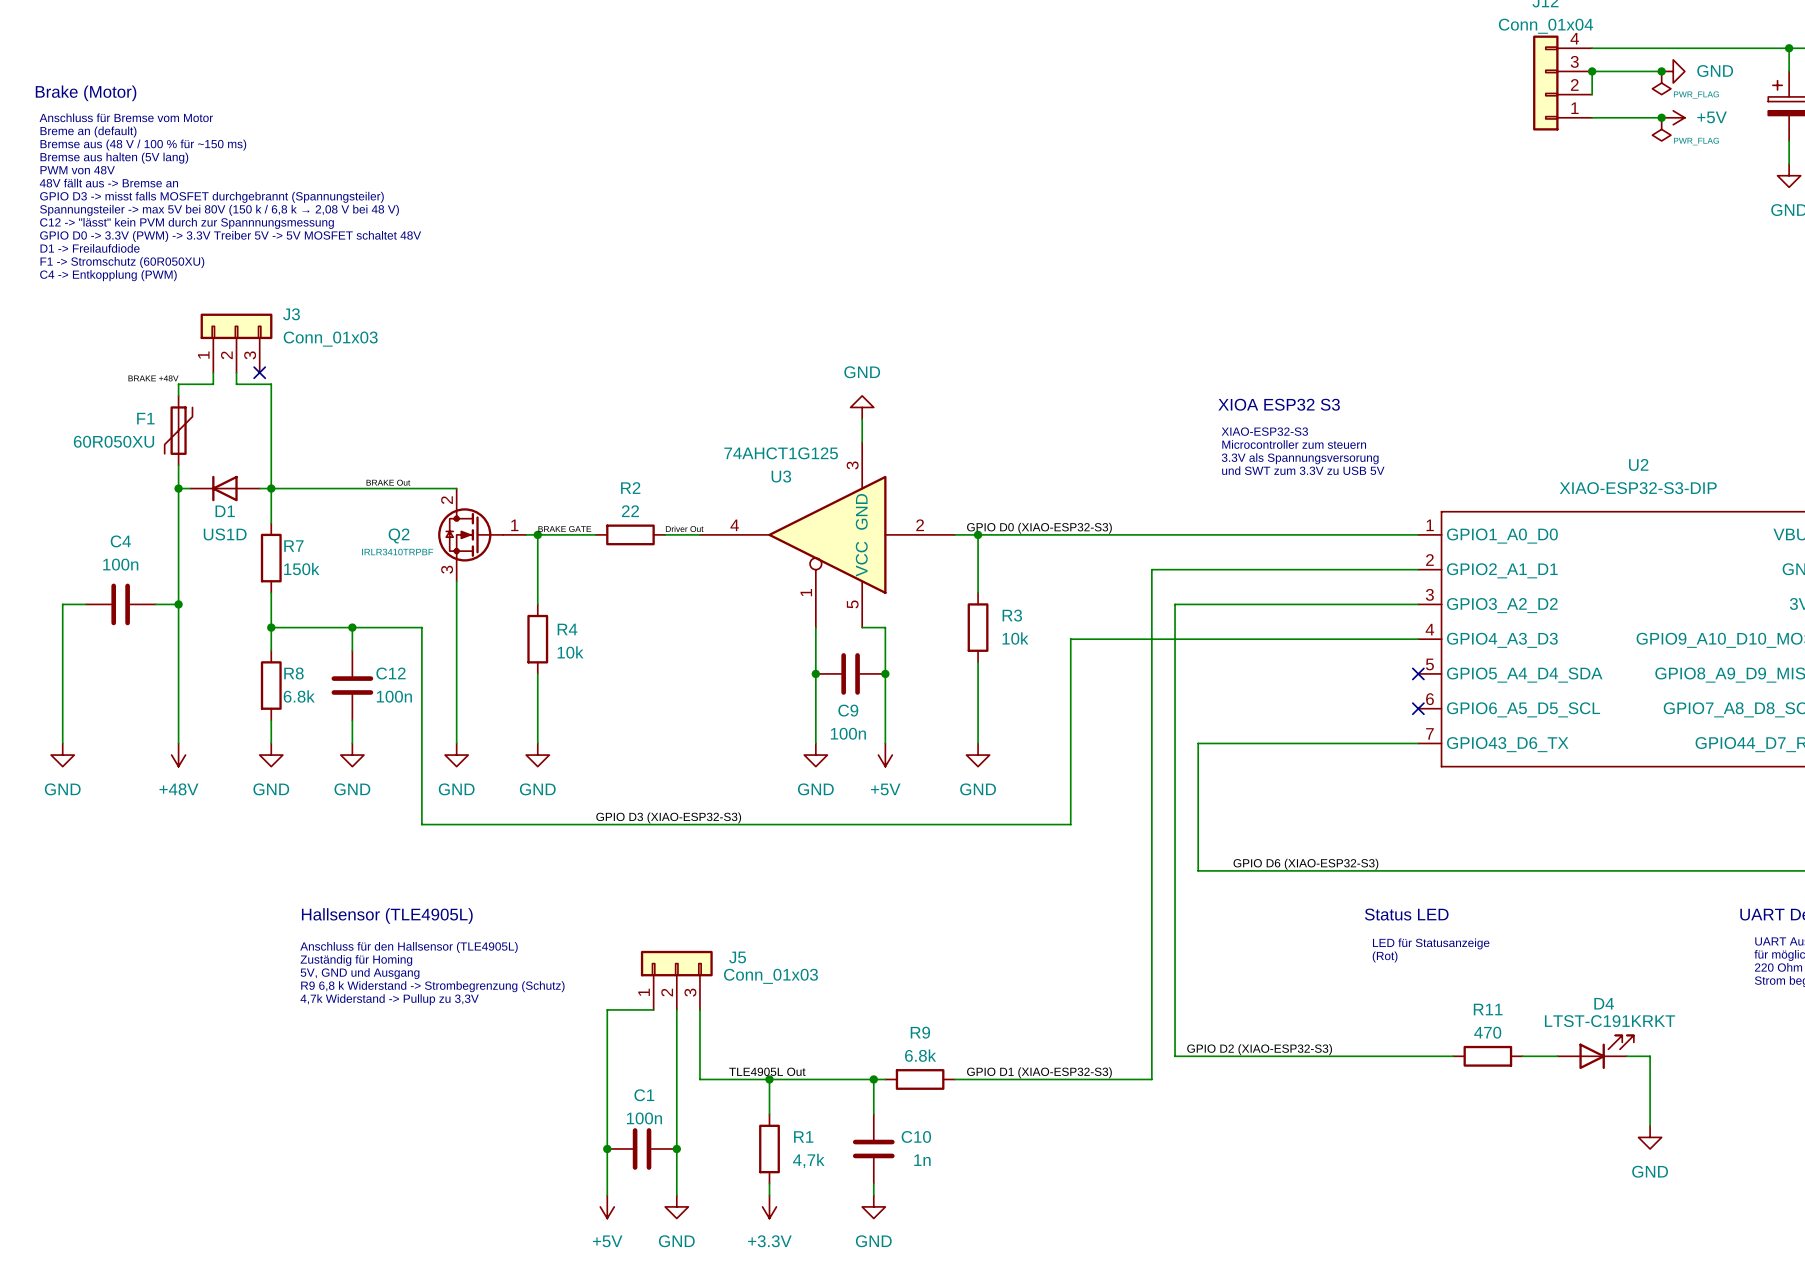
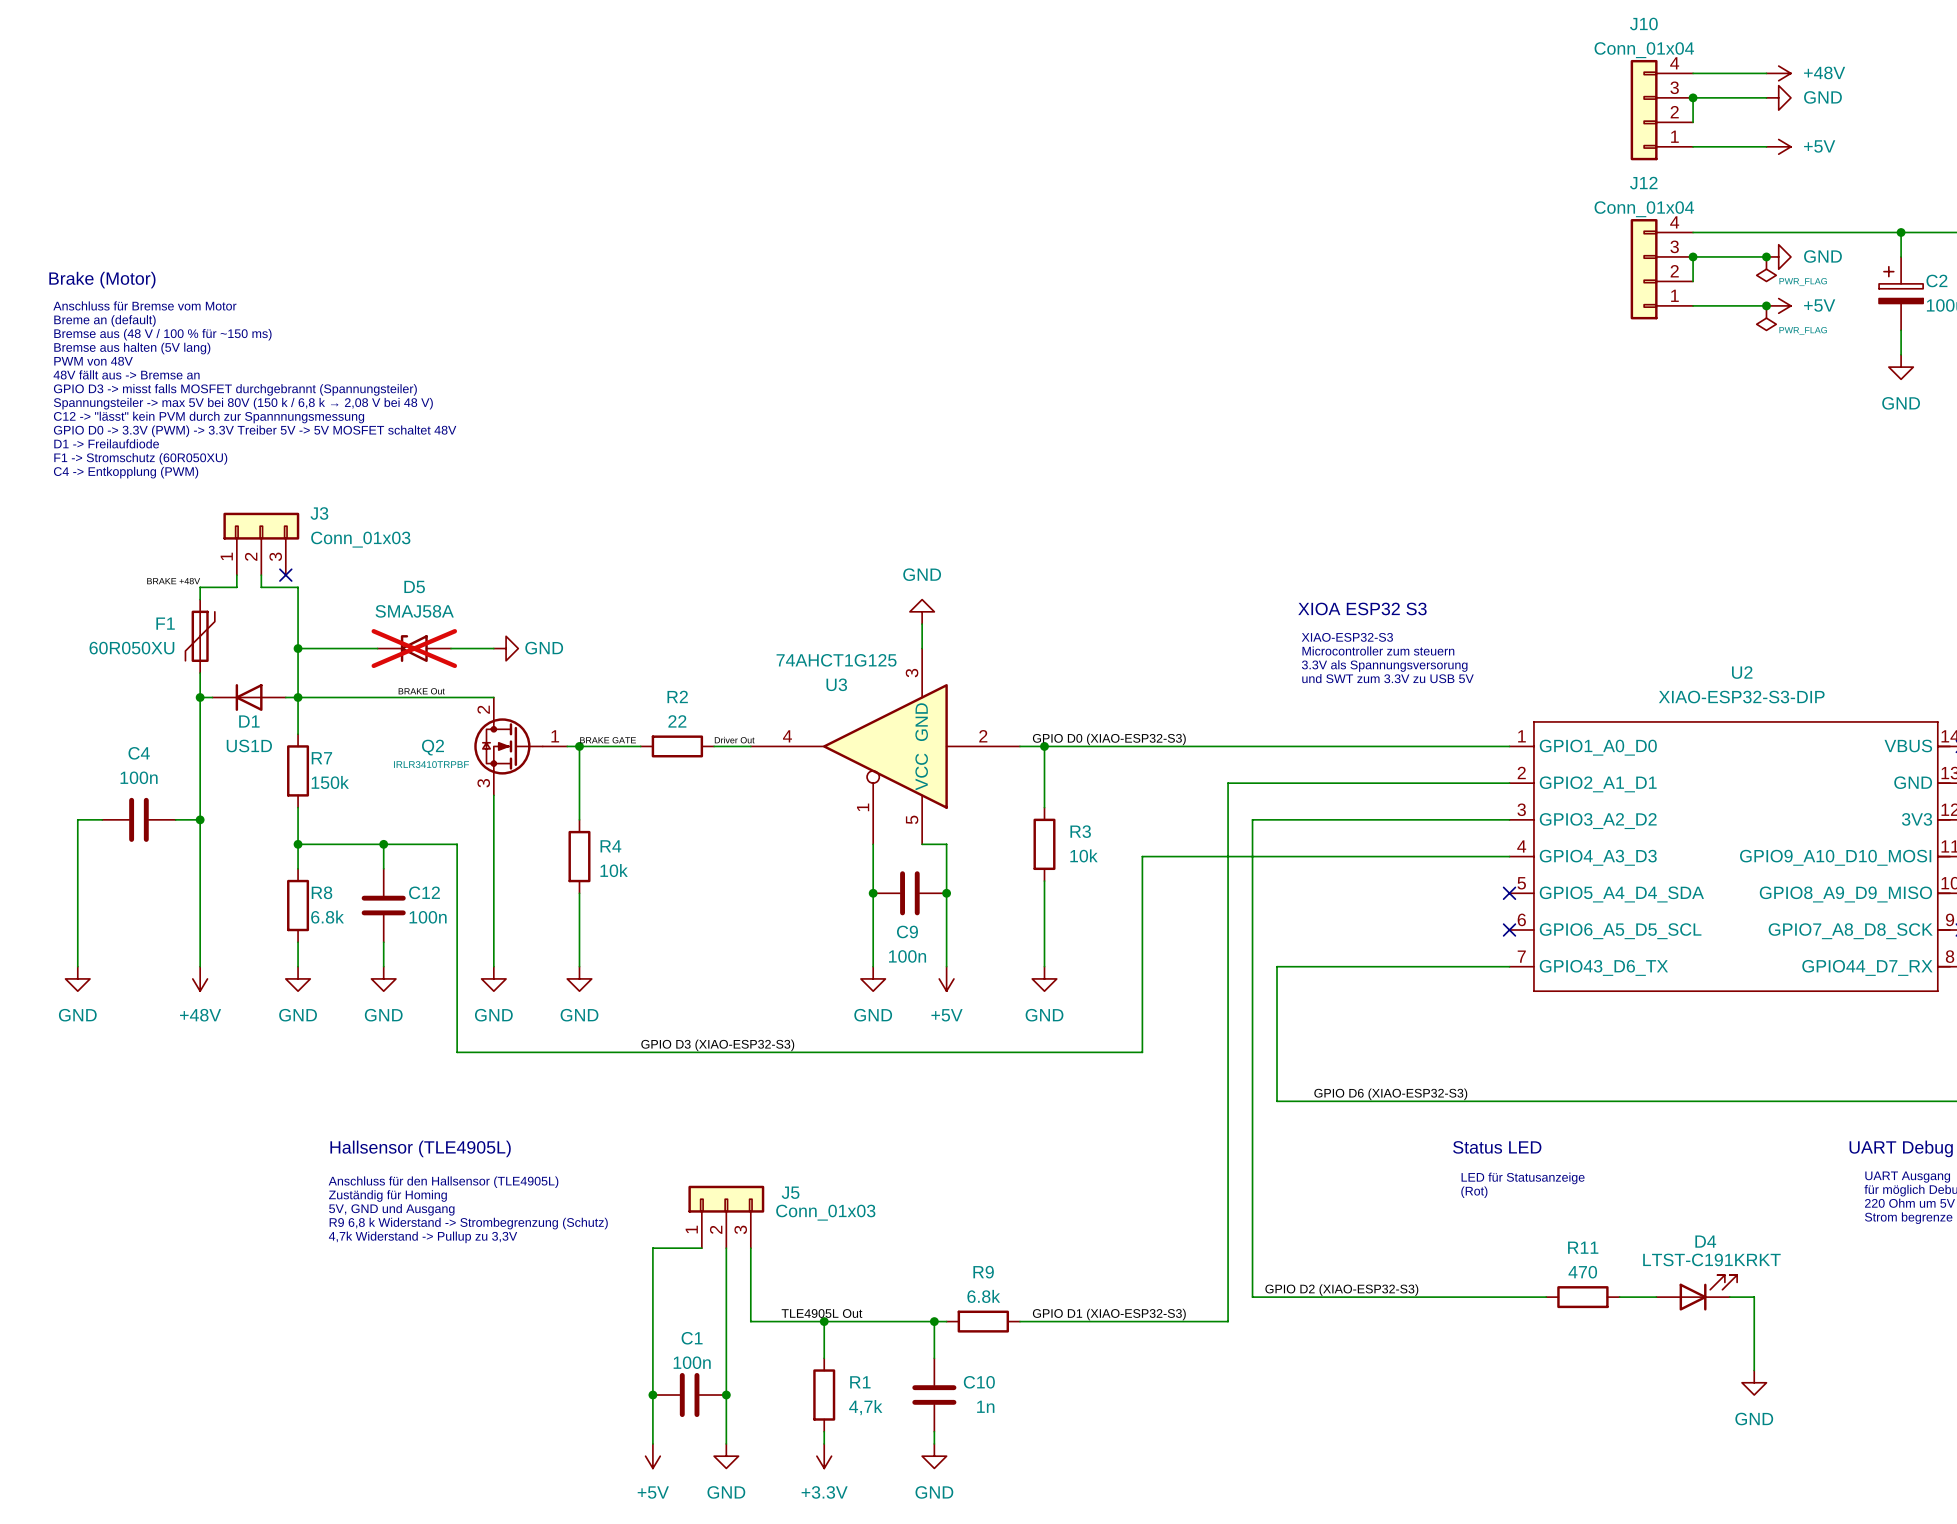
wire: none -> (298, 648) (377, 648)
junction: none -> (298, 648)
D5: none -> SMAJ58A (414, 648)
wire: none -> (451, 648) (493, 648)
power symbol: none -> GND (506, 648)

